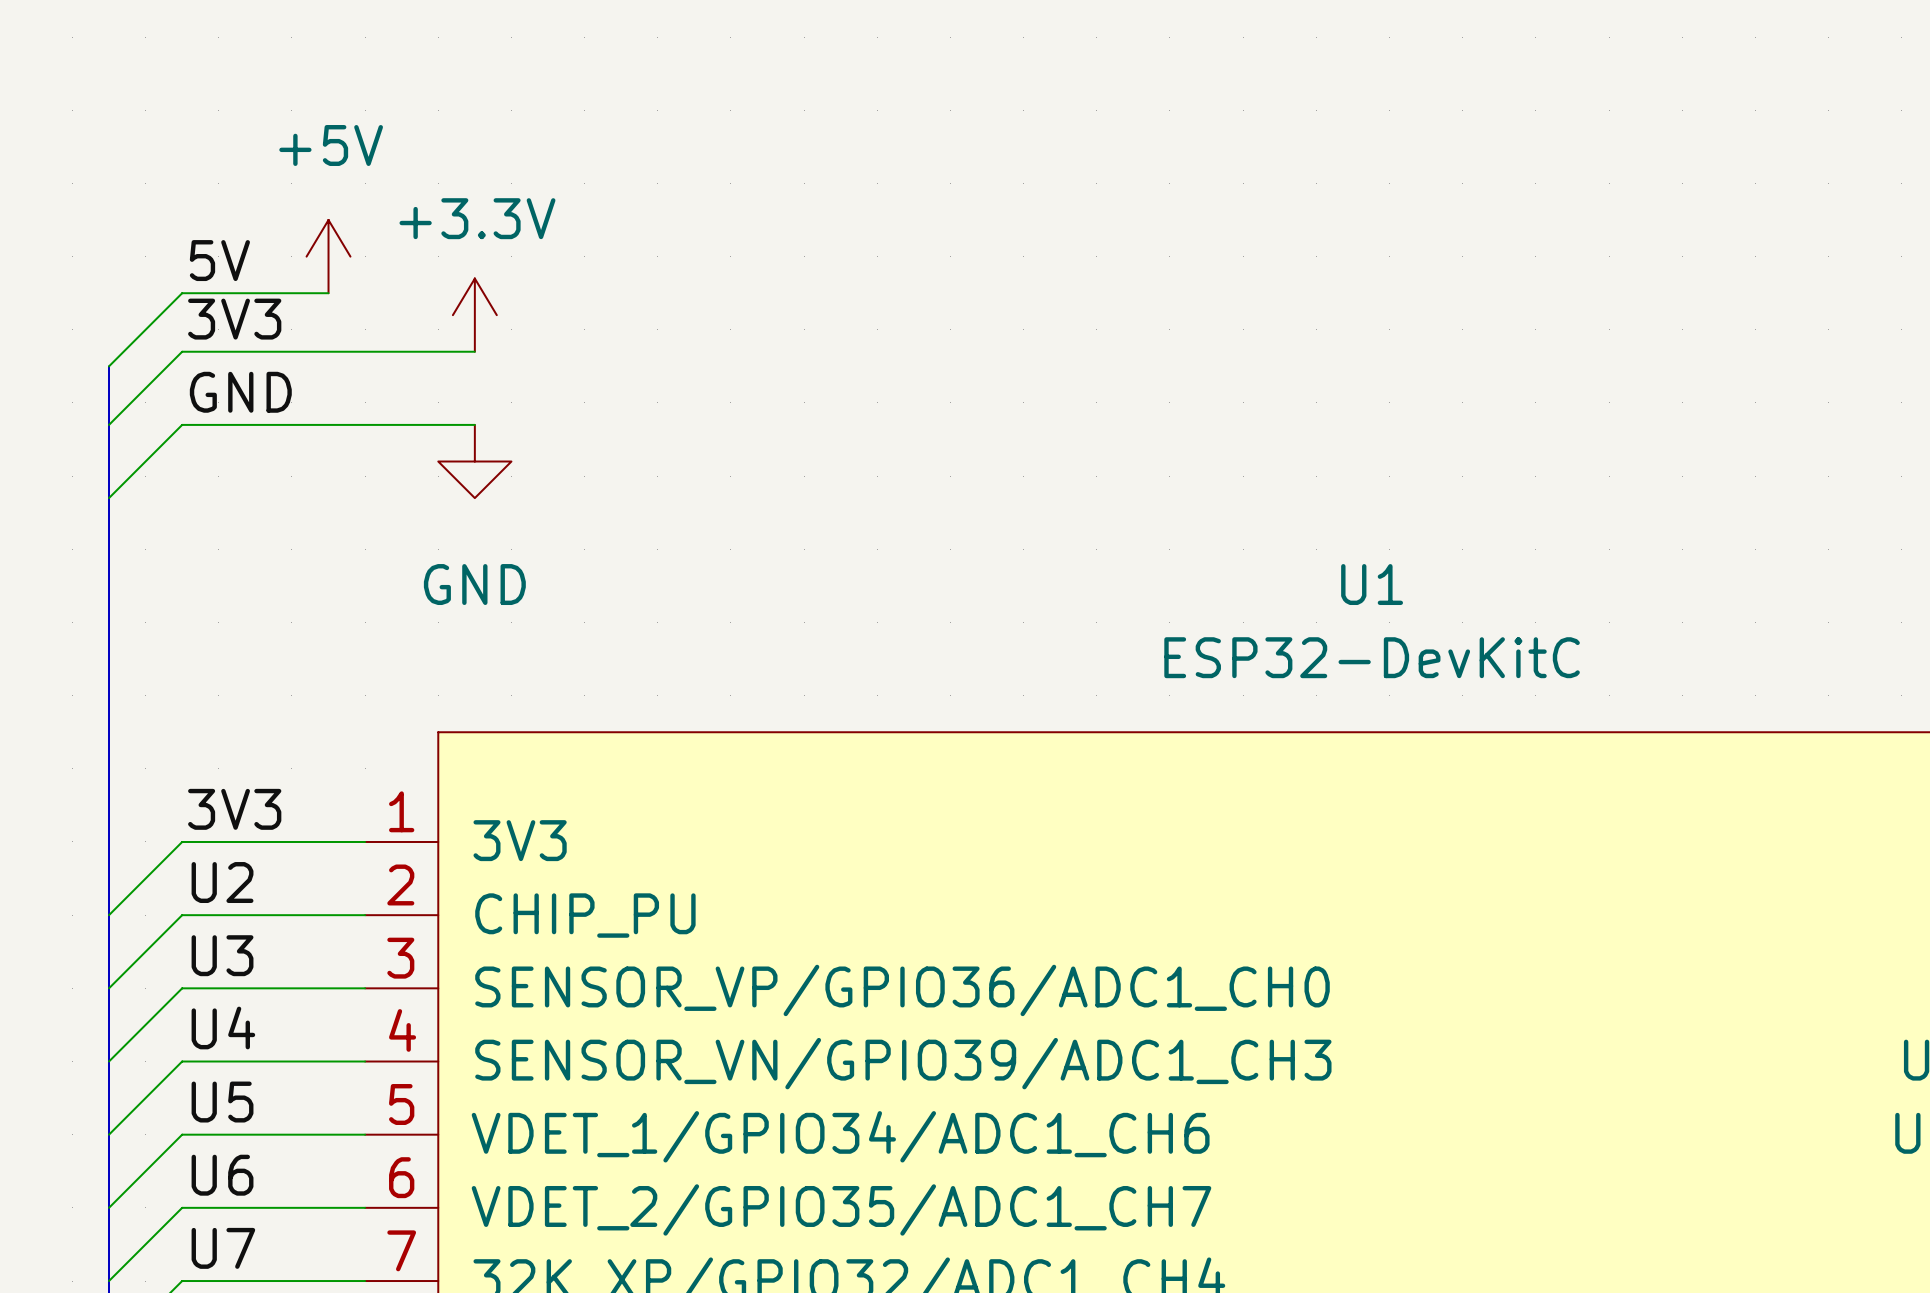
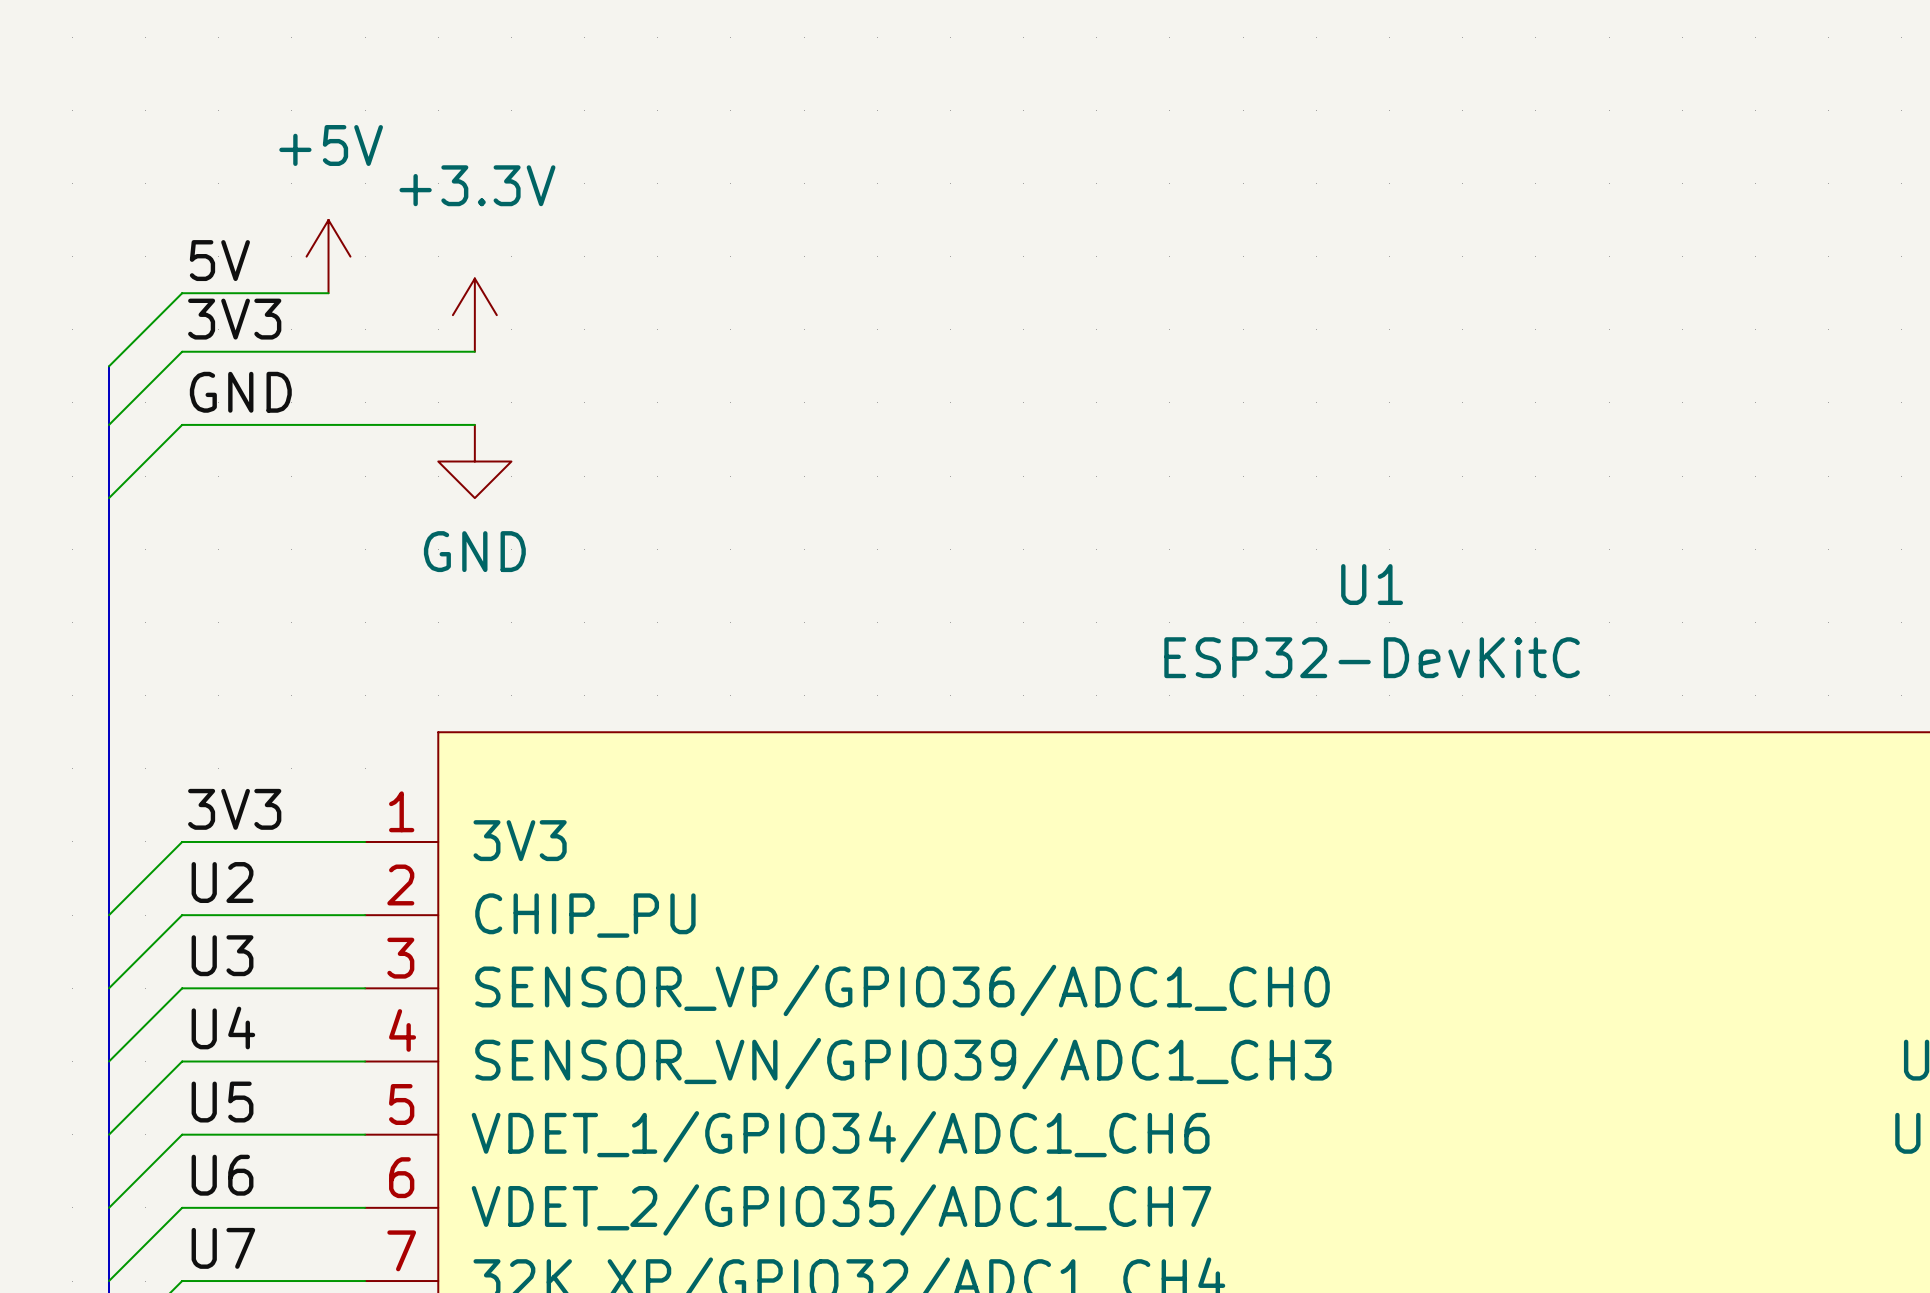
power symbol text position: +3.3V (477, 218) -> +3.3V (477, 185)
power symbol text position: GND (474, 584) -> GND (474, 551)

